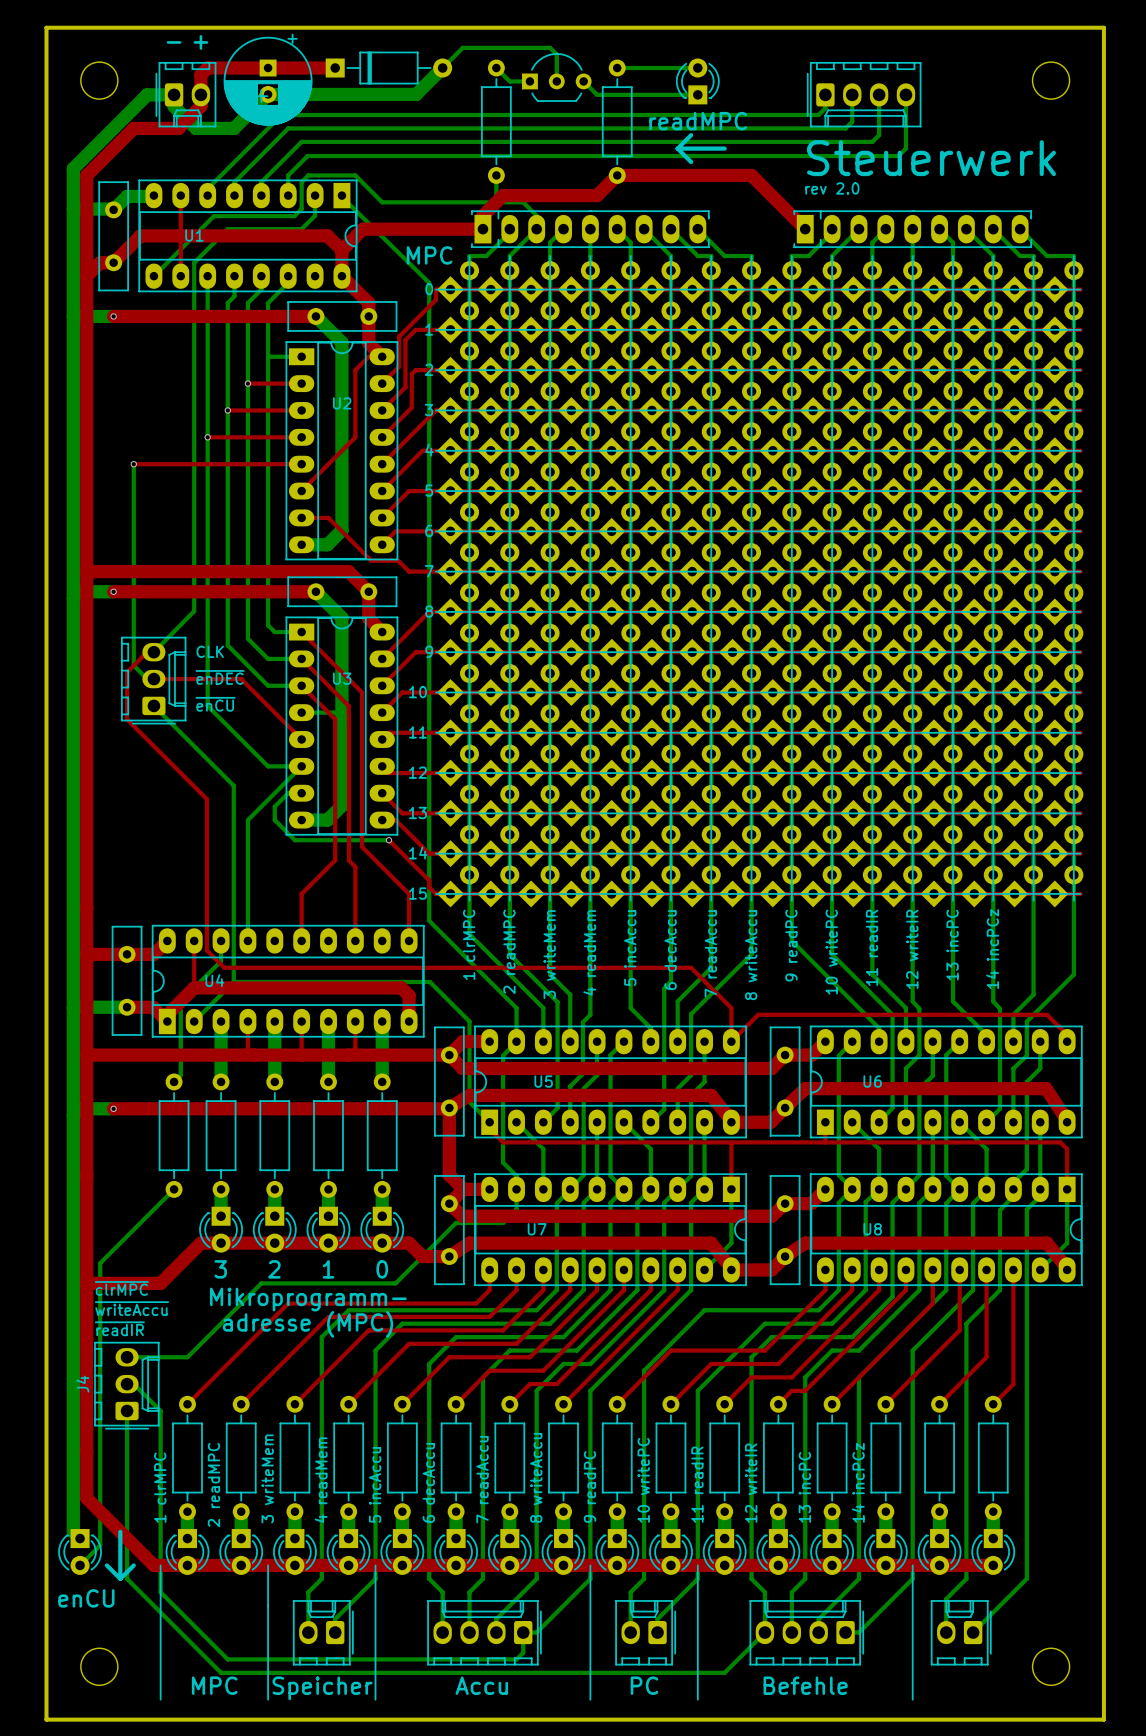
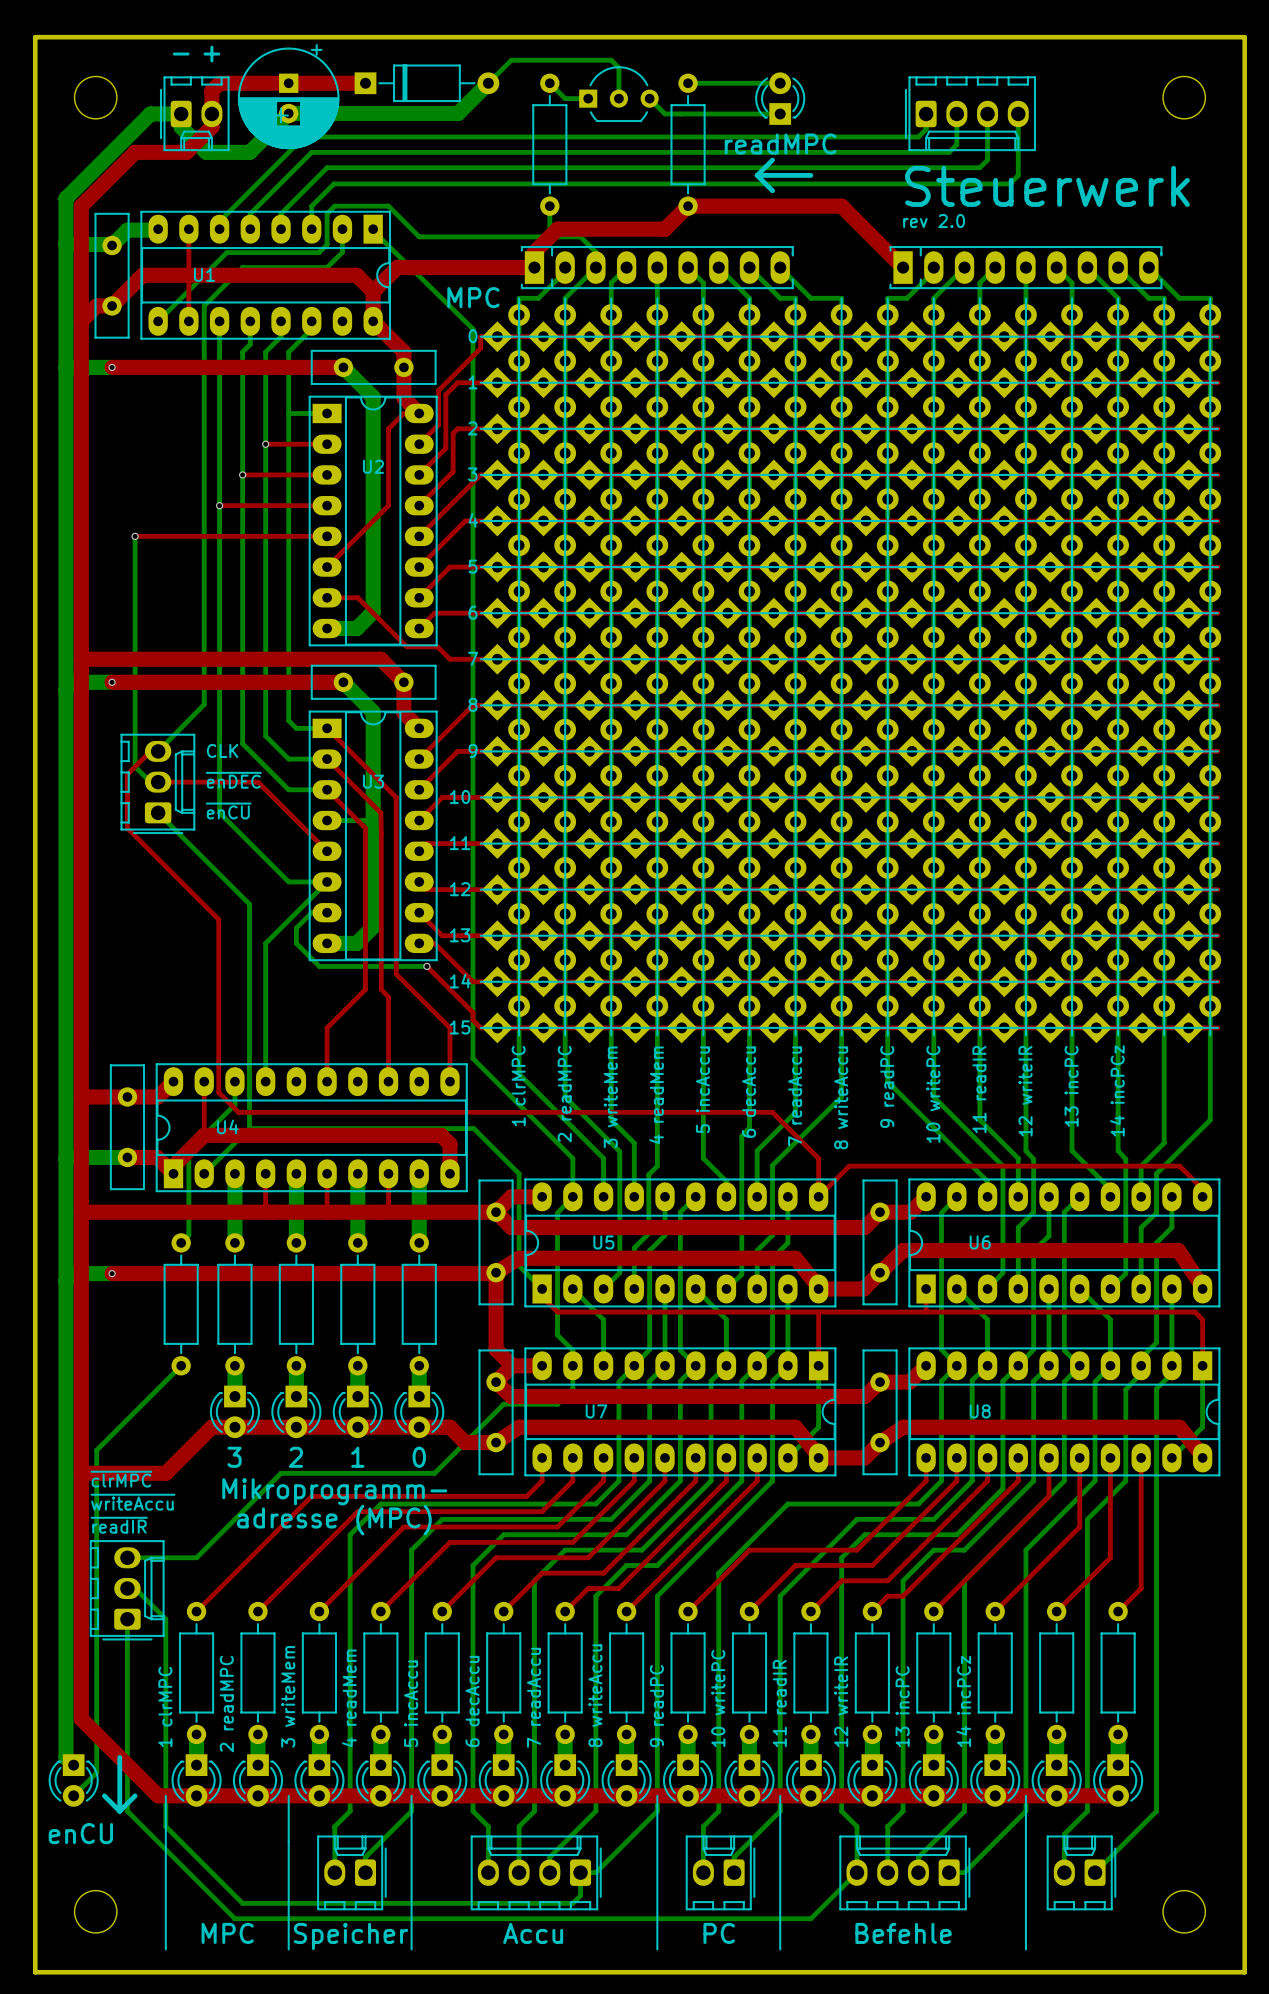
J4 name: J4 (82, 1384) -> none

